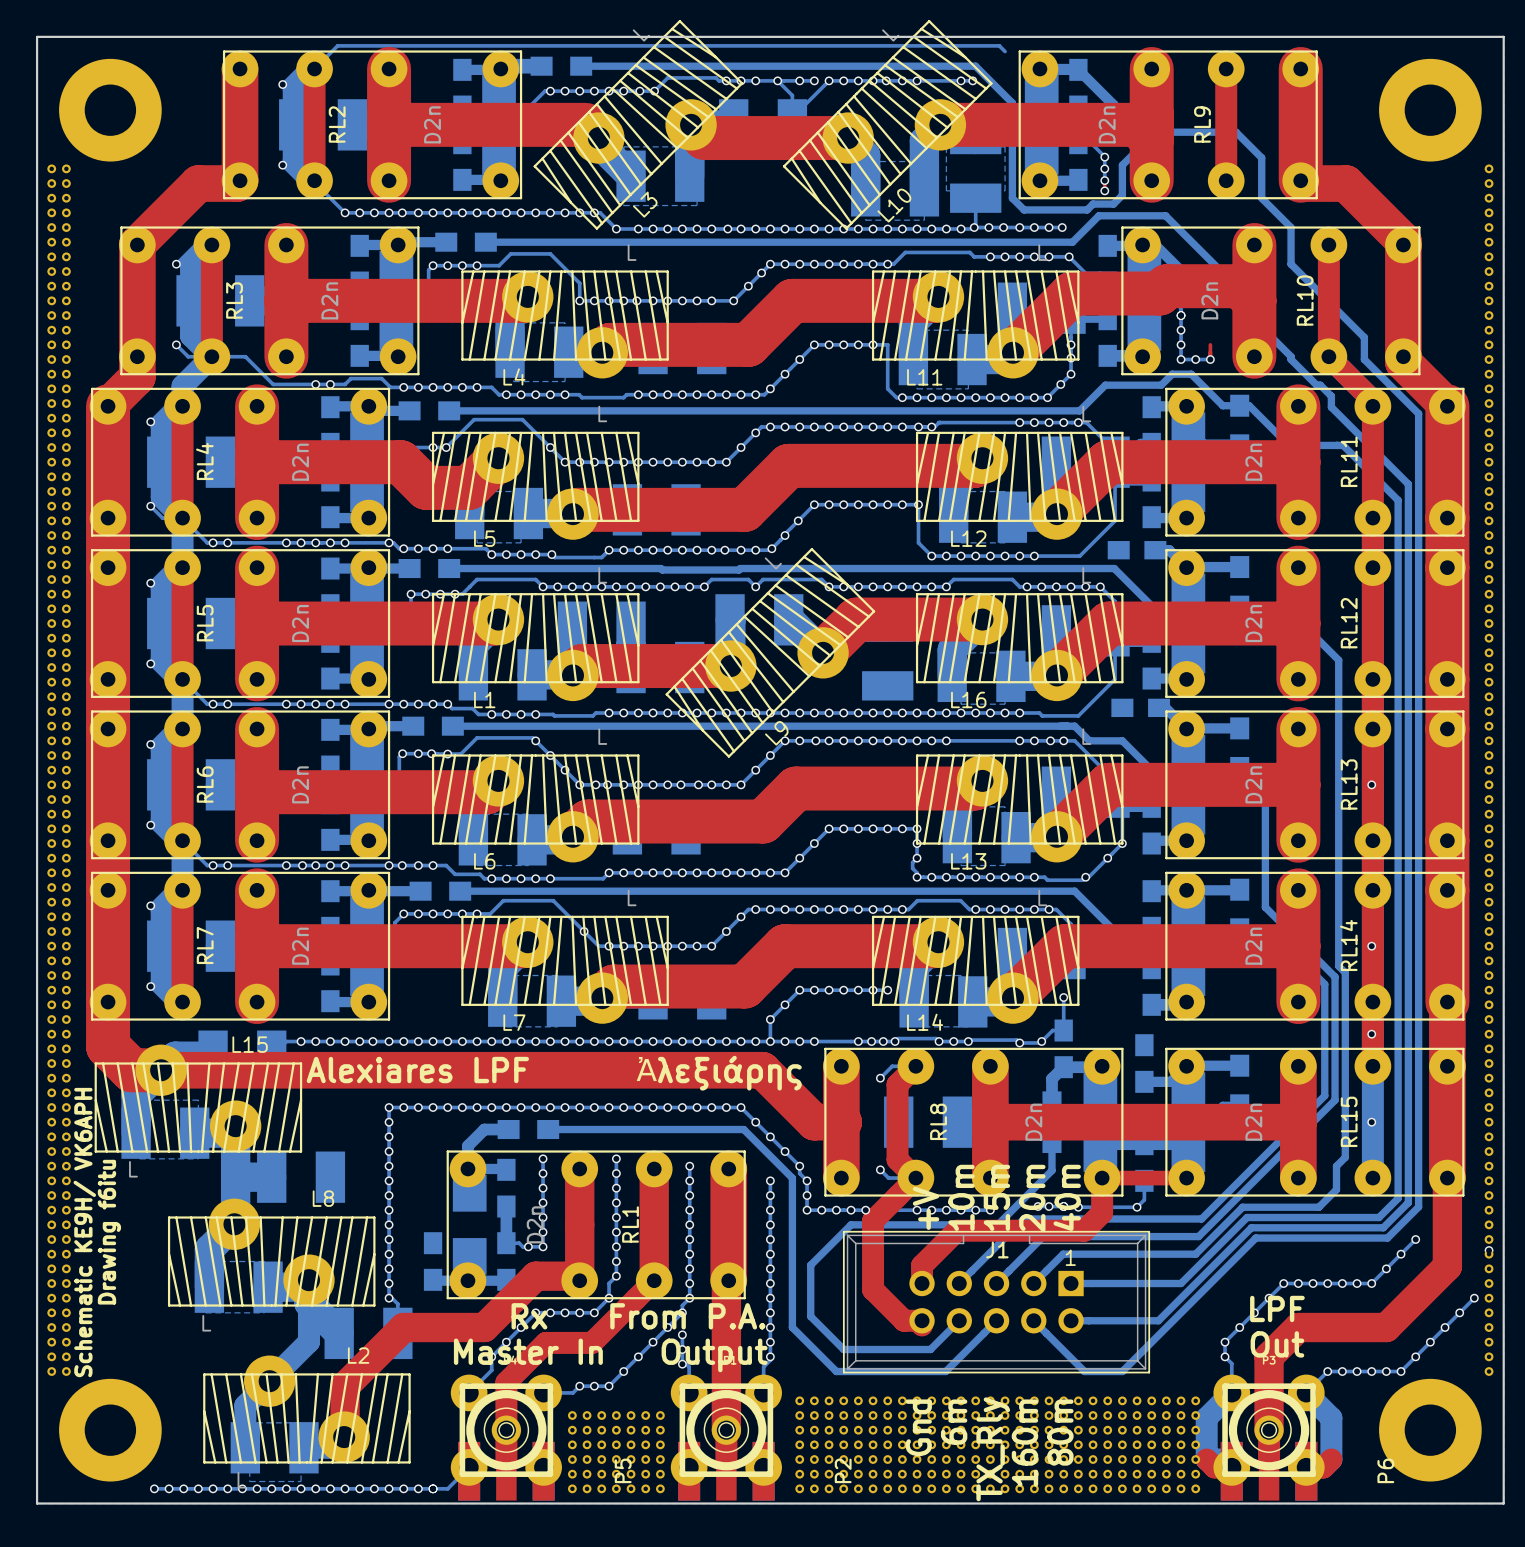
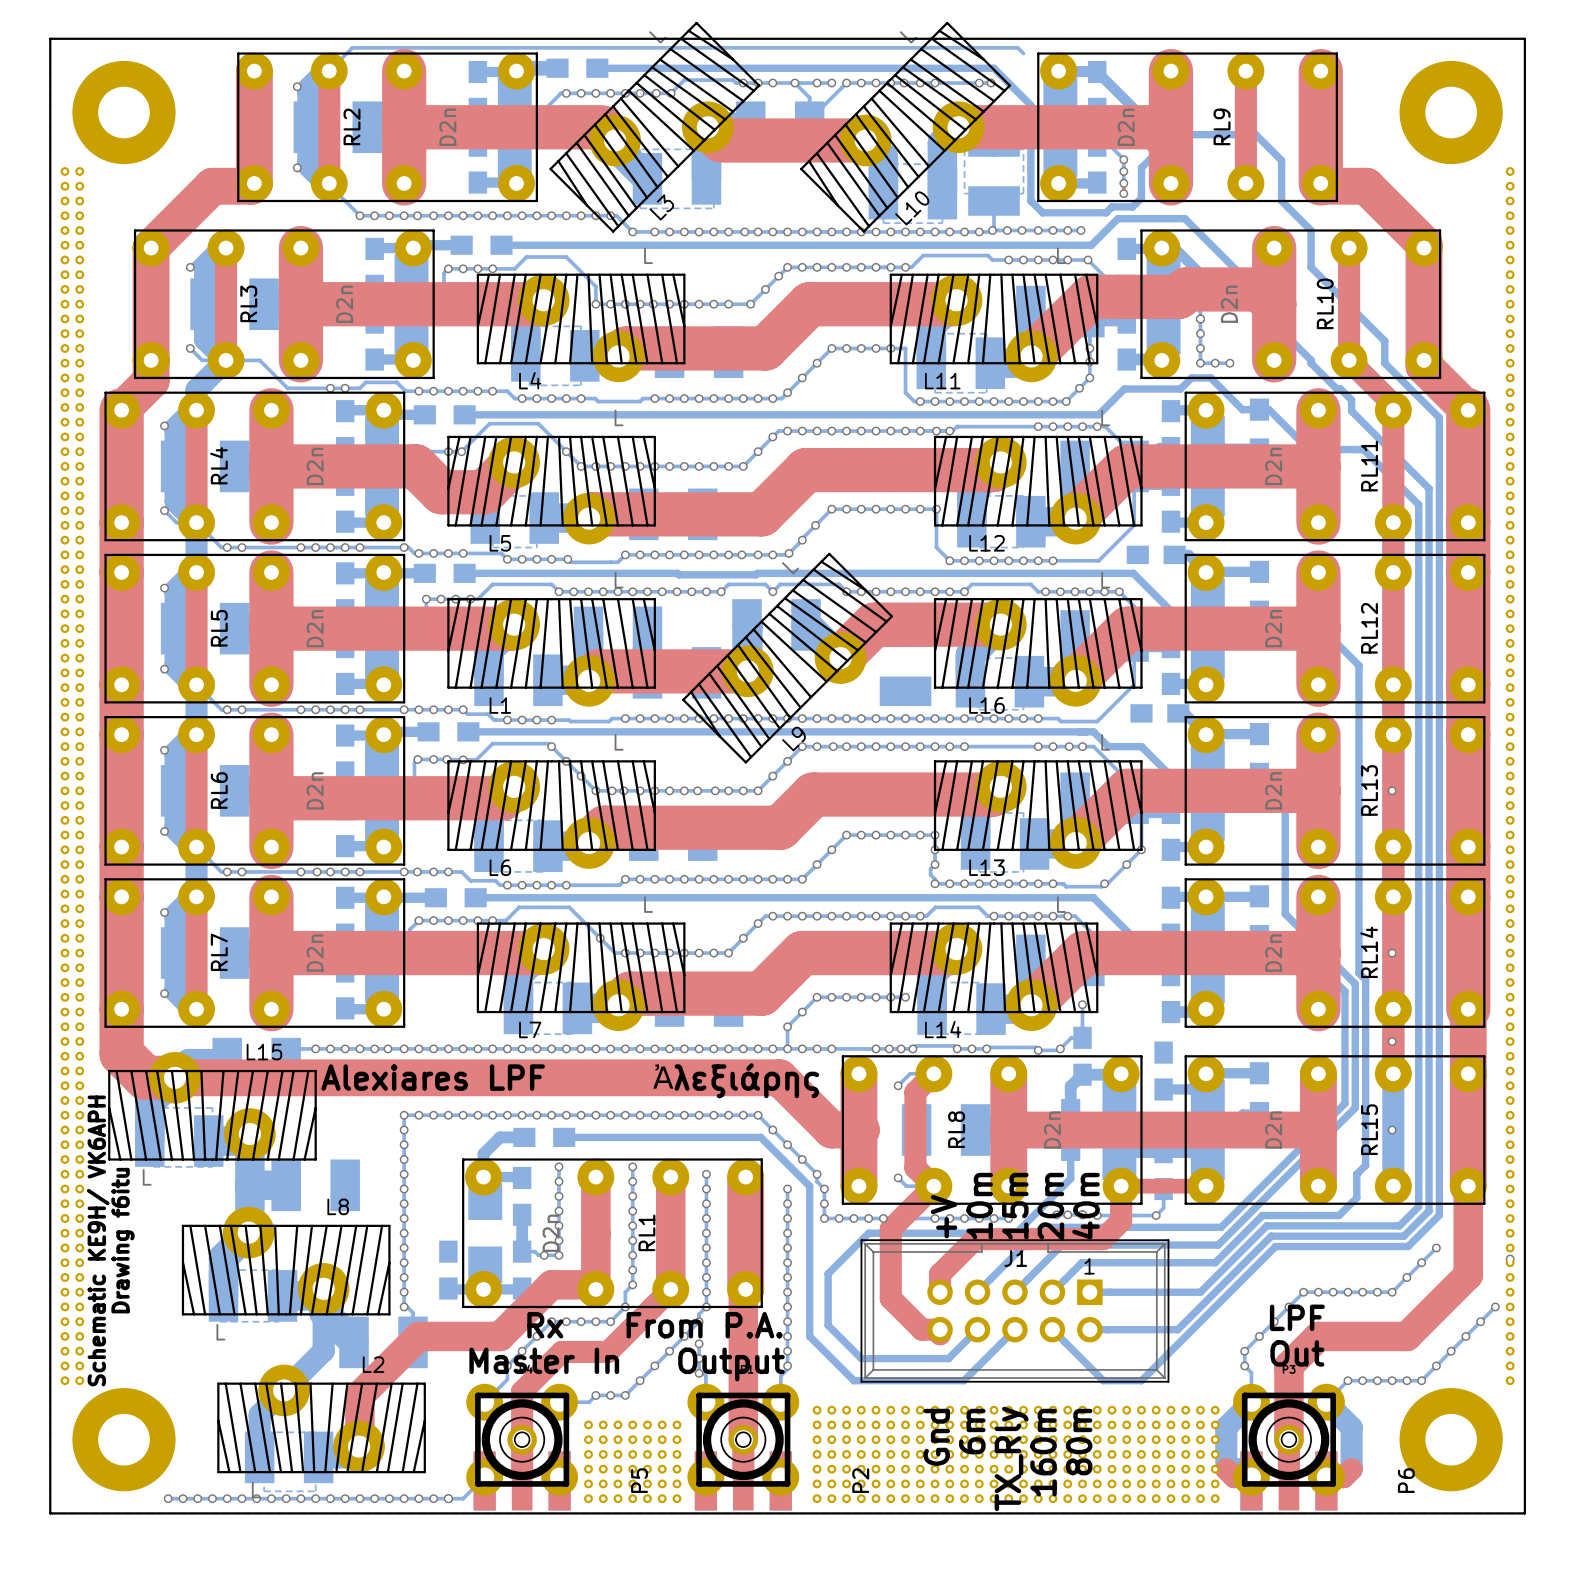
top track: (1210, 344) (1210, 359) -> none

